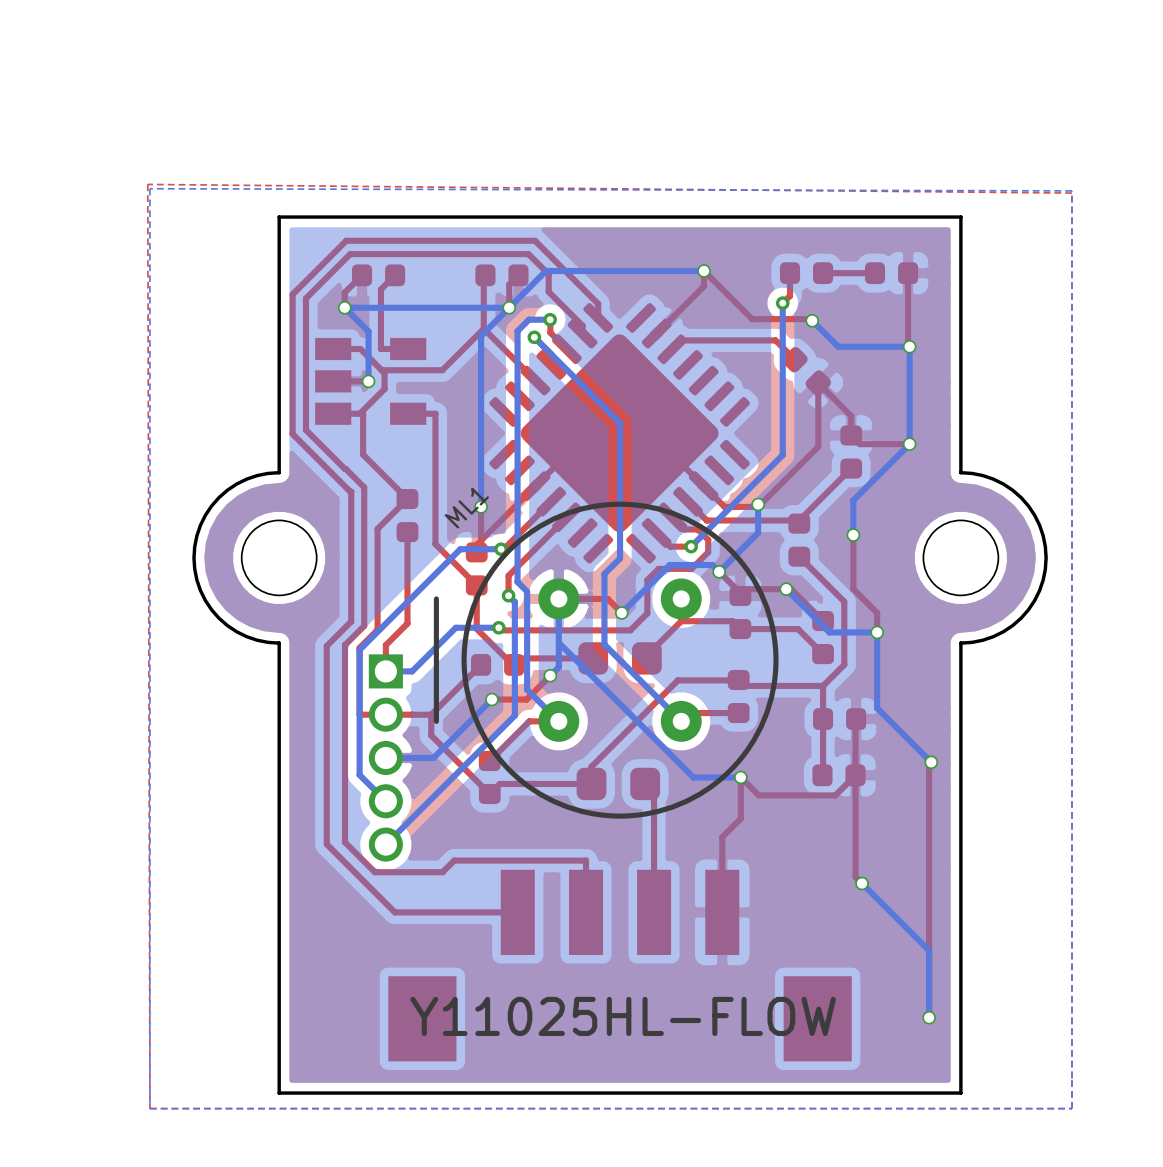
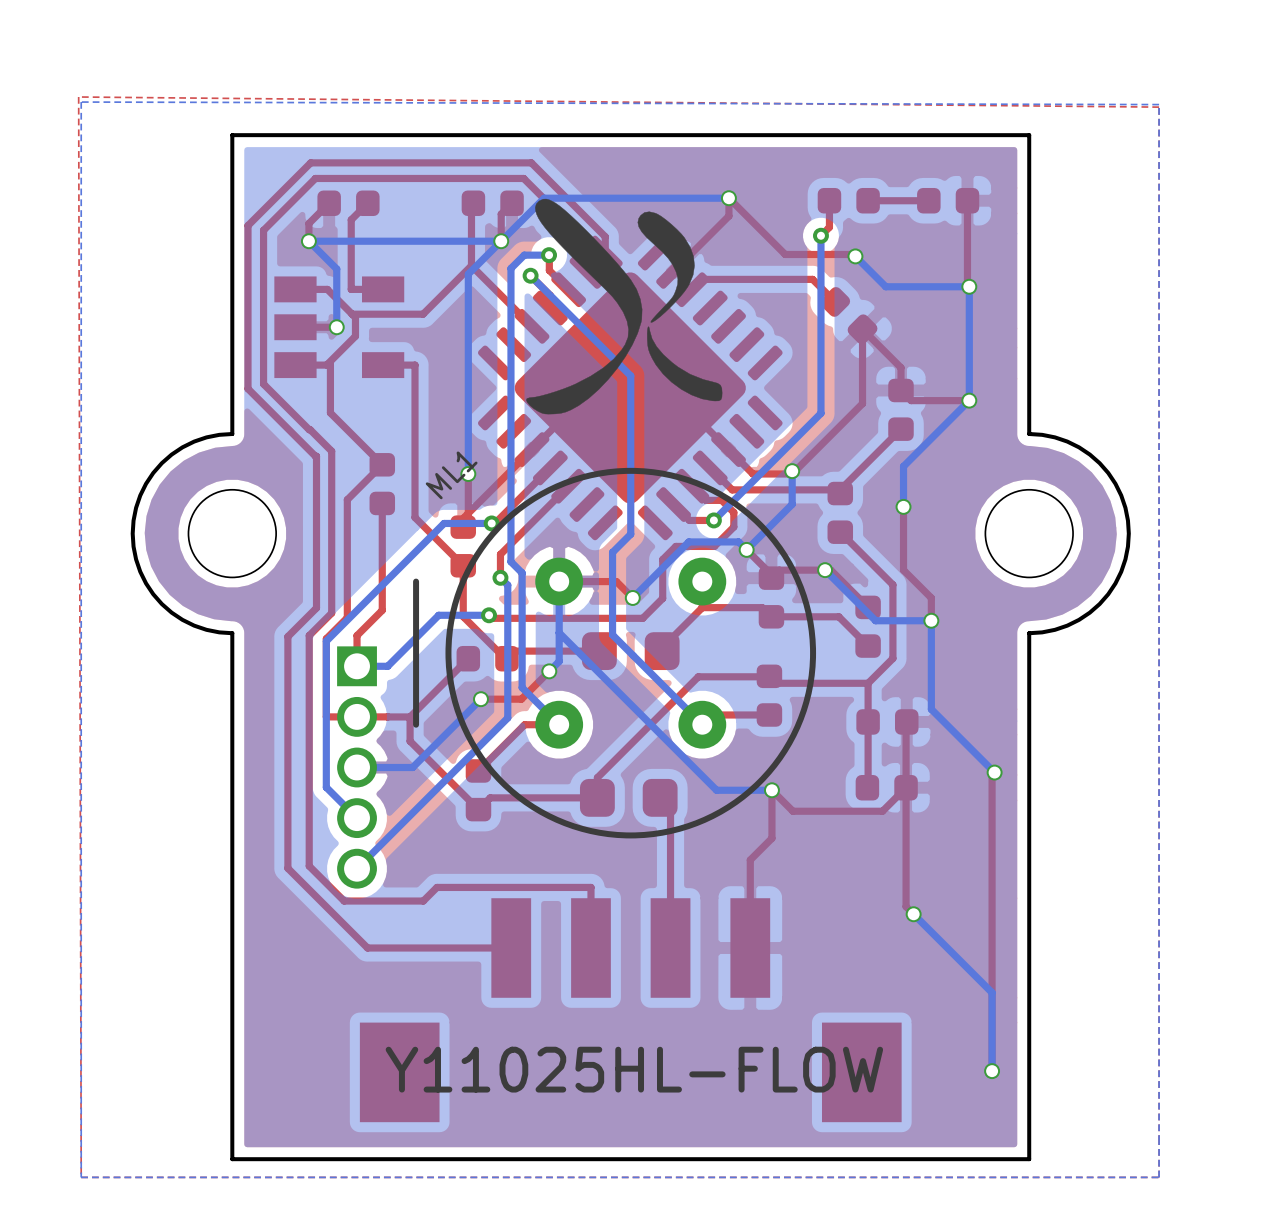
drawing: none -> [526, 198, 723, 415]

